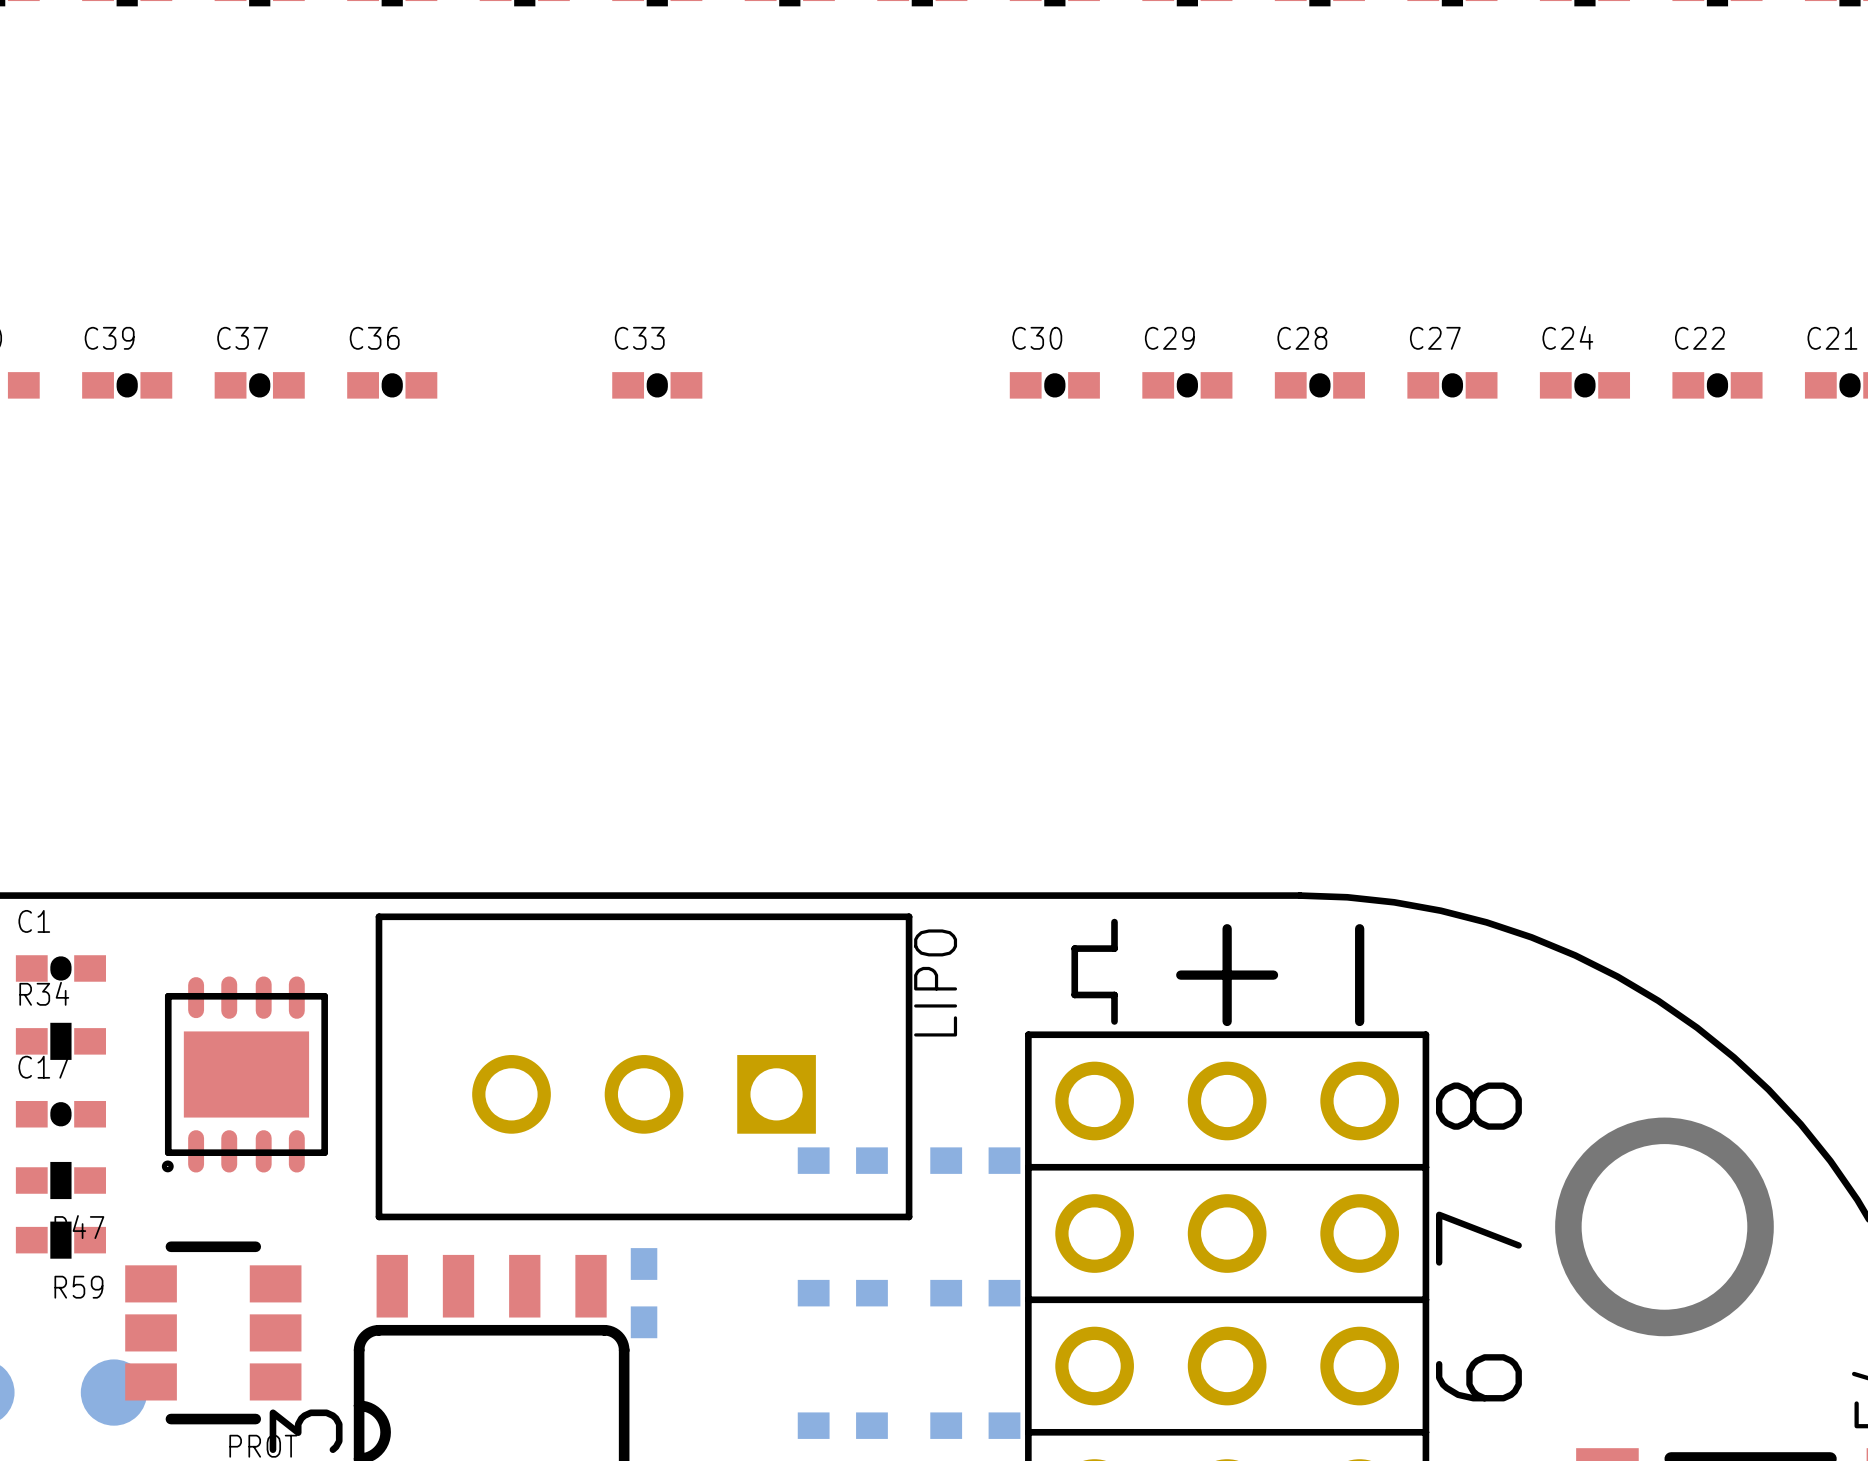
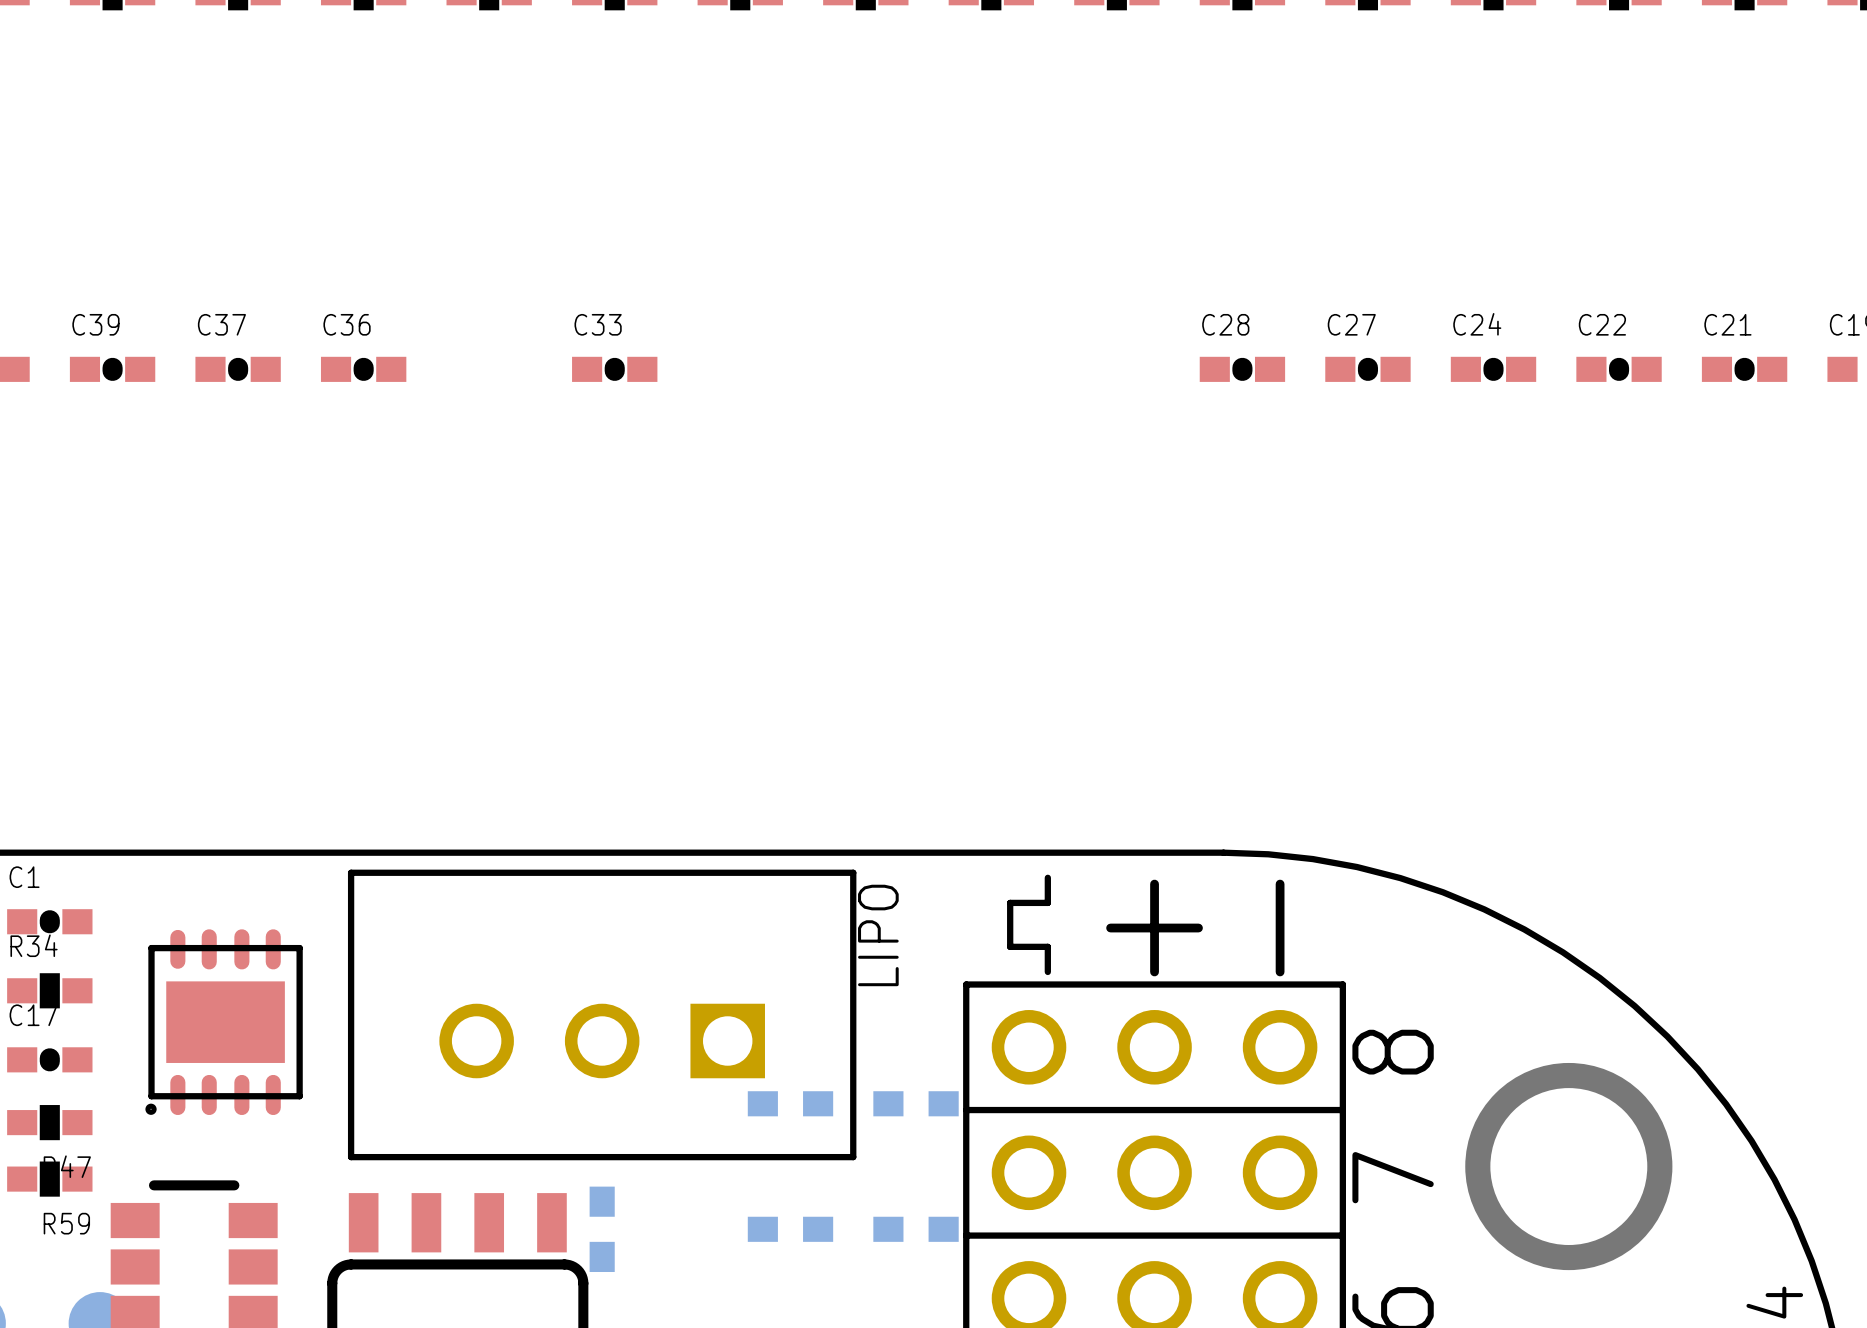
C30: (1054, 385) -> none
C29: (1187, 385) -> none

